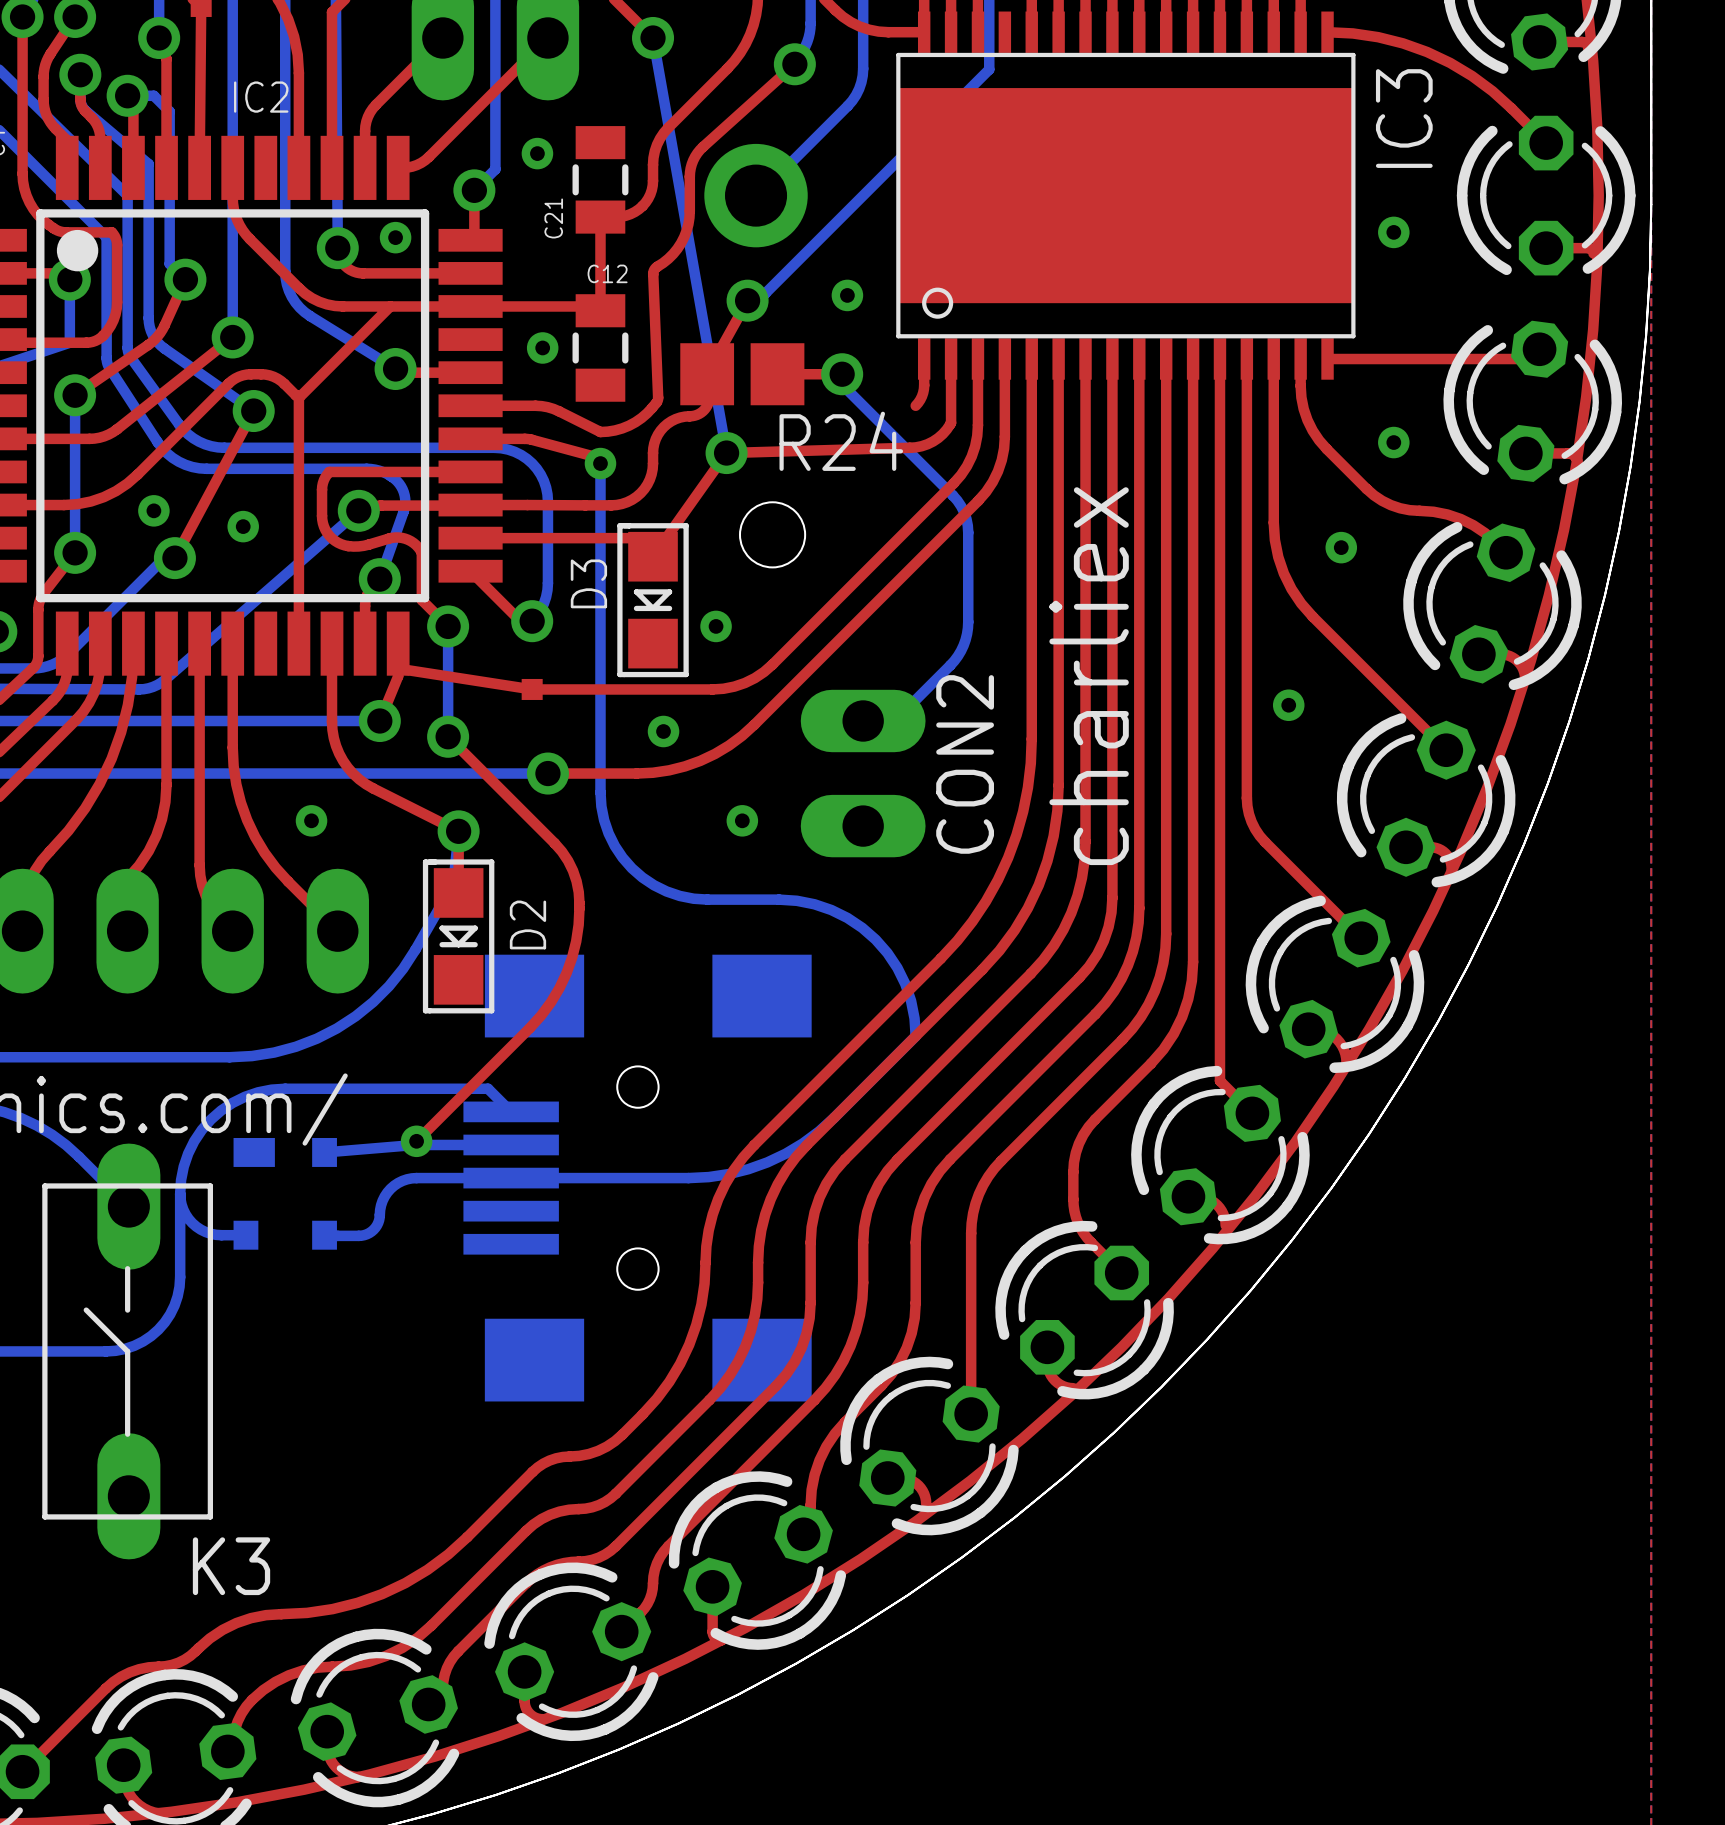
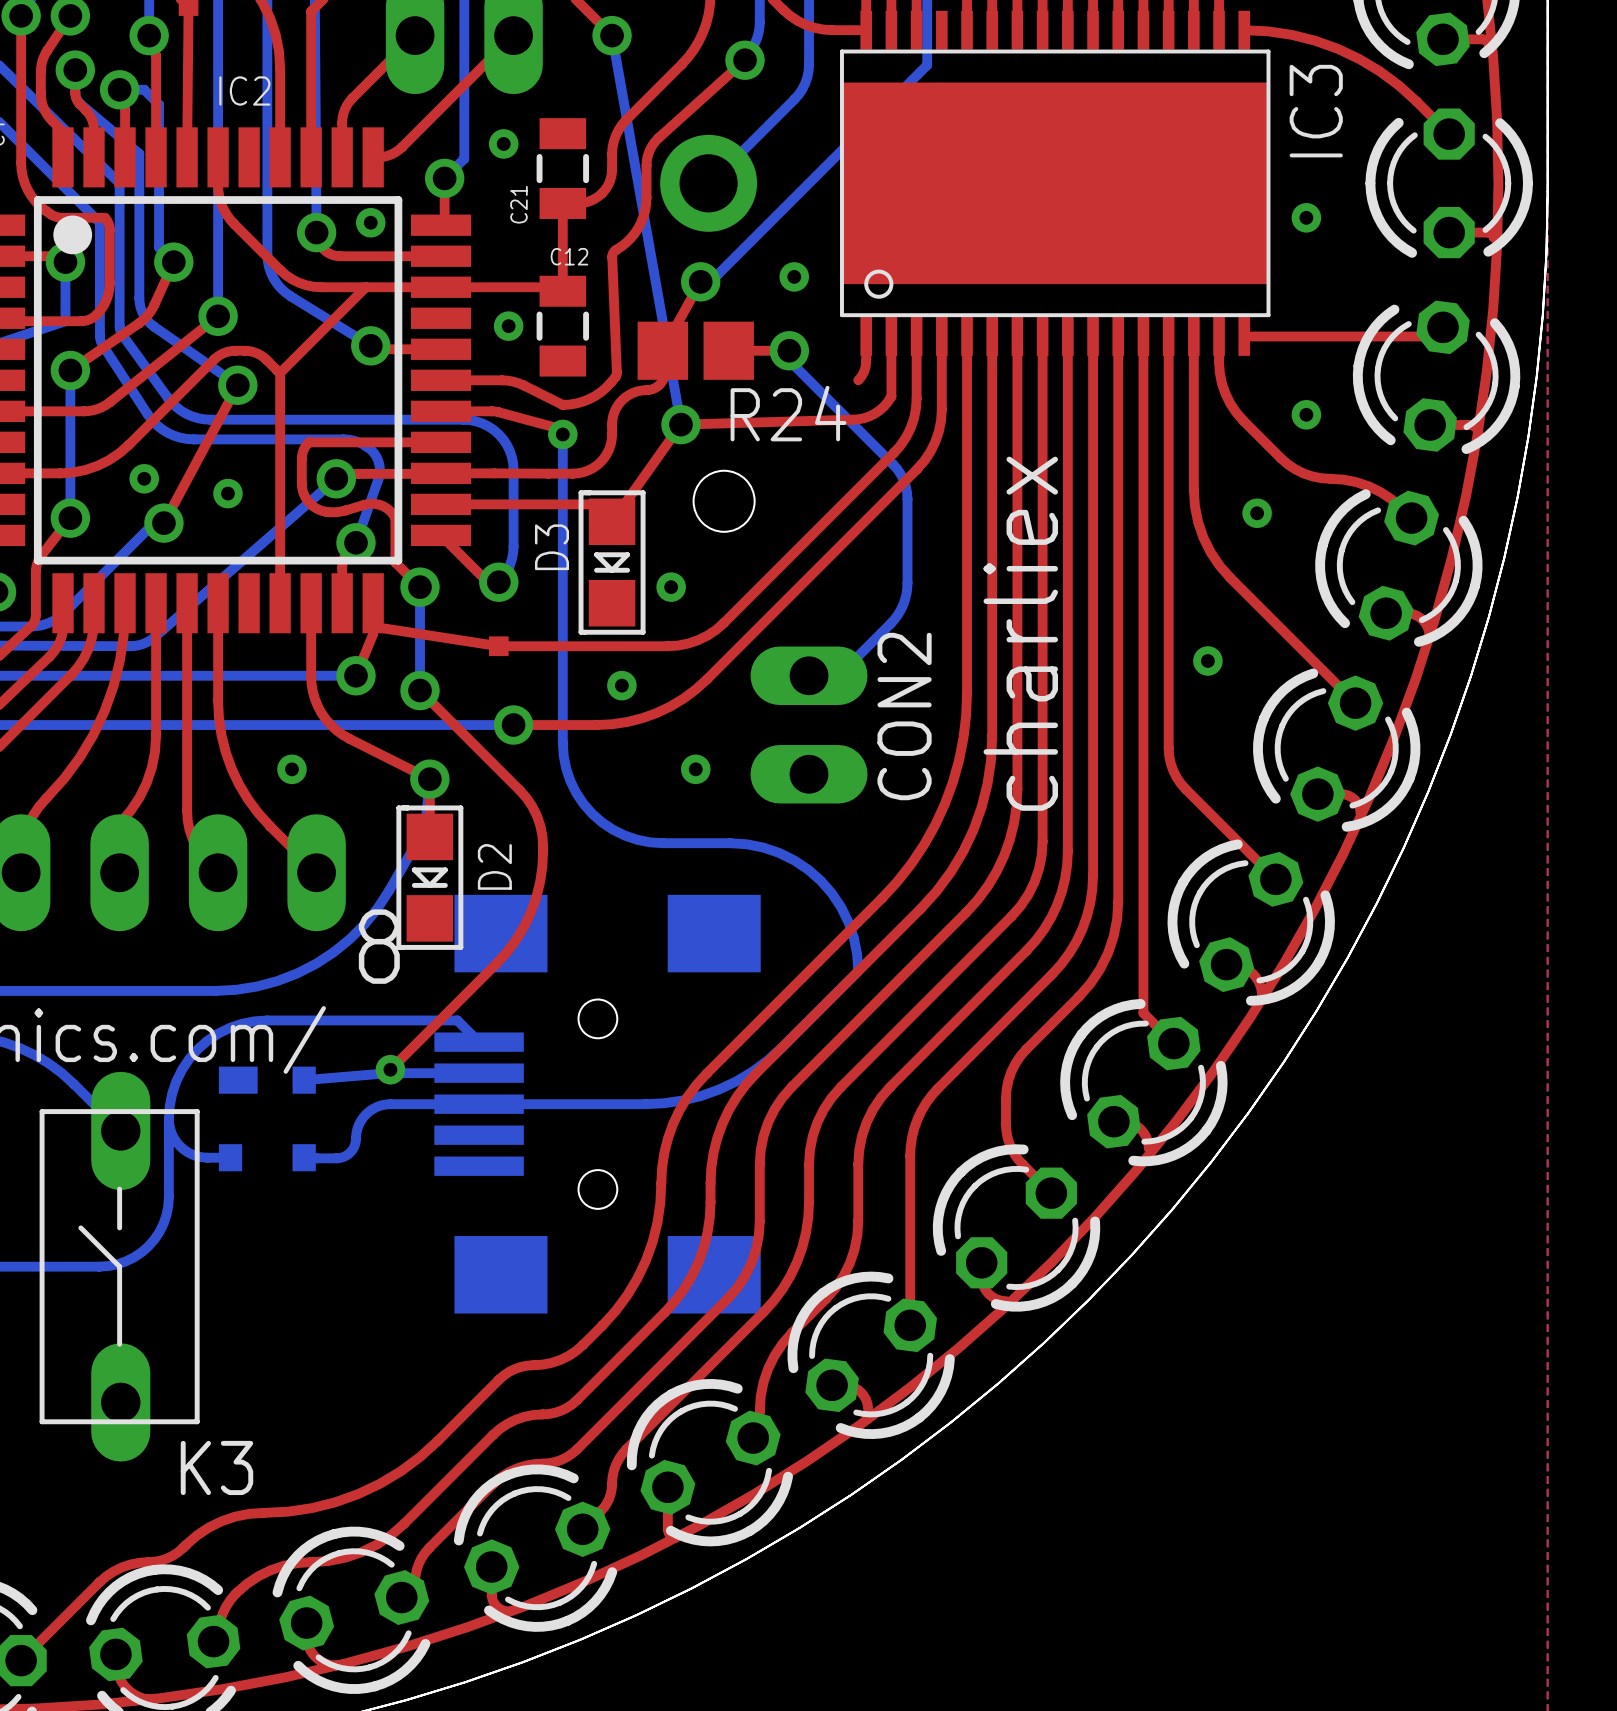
text: none -> 8 (379, 946)

